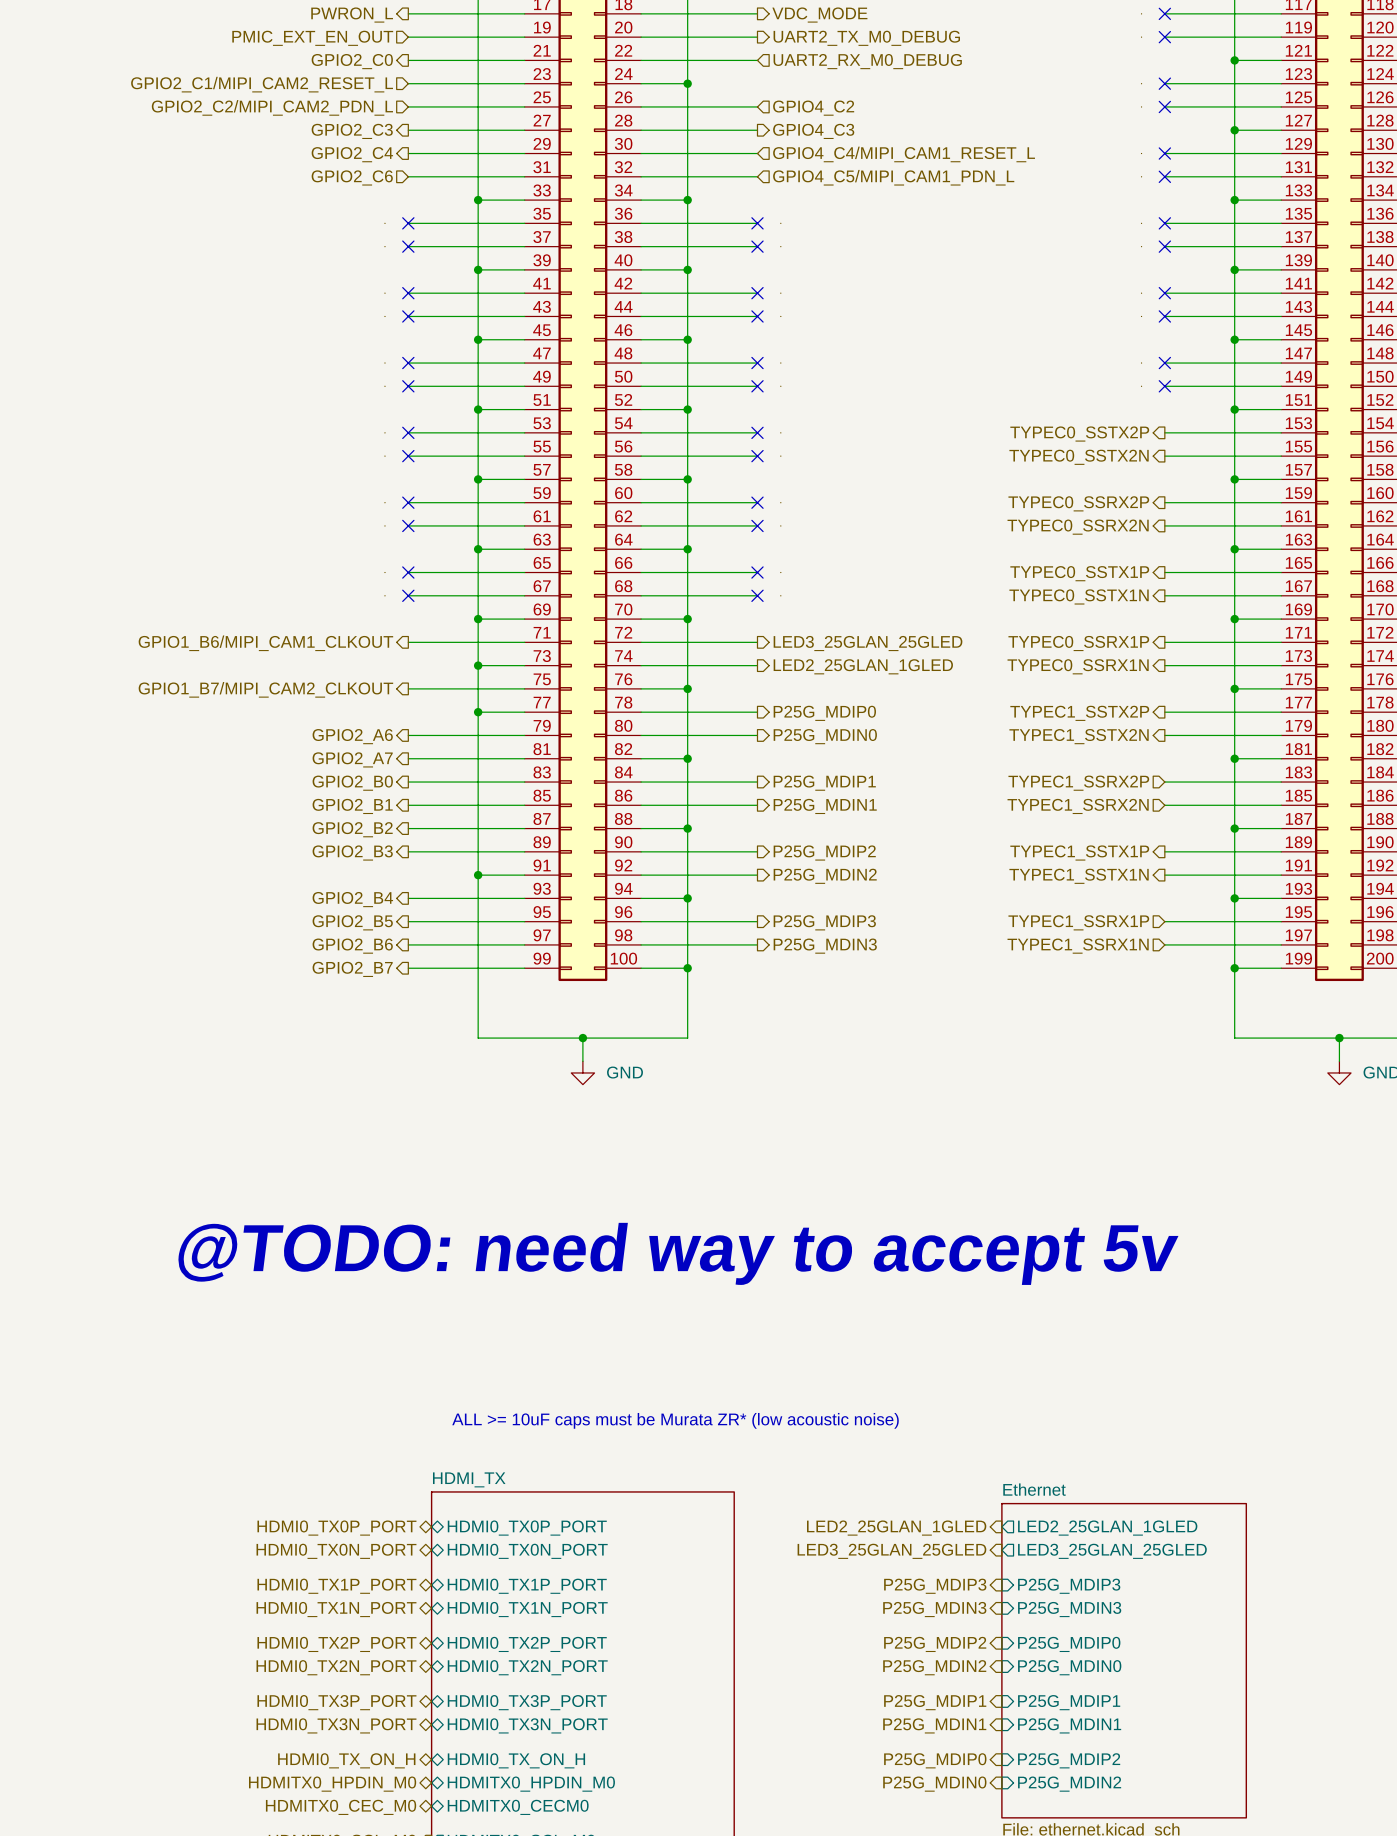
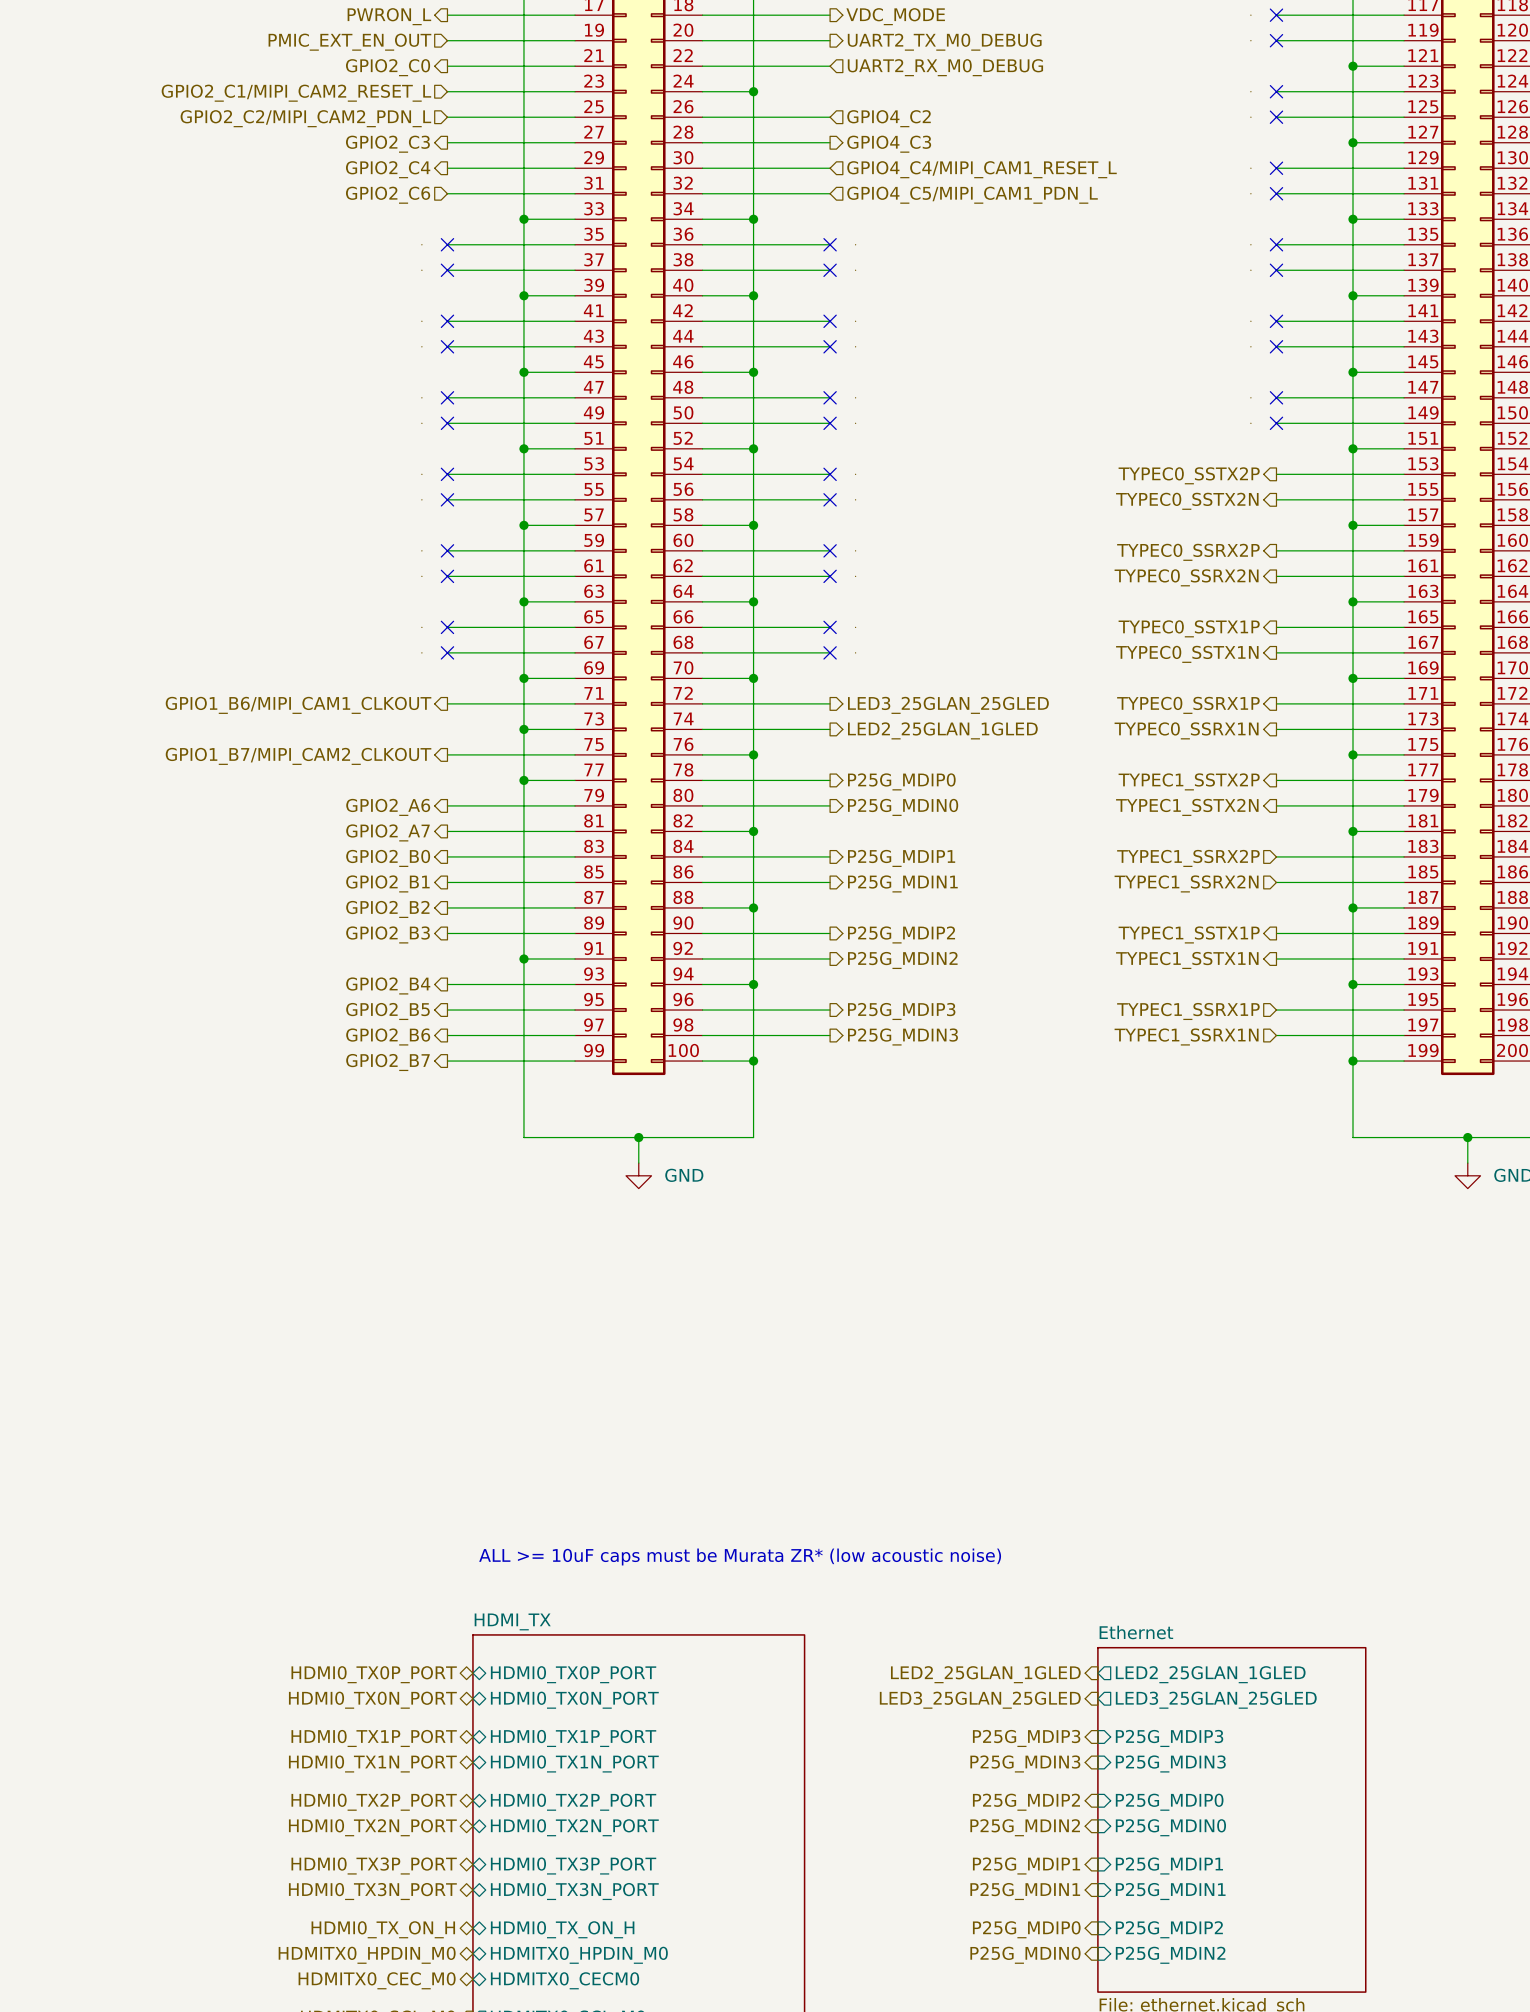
text: @TODO: need way to accept 5v (678, 1253) -> none

